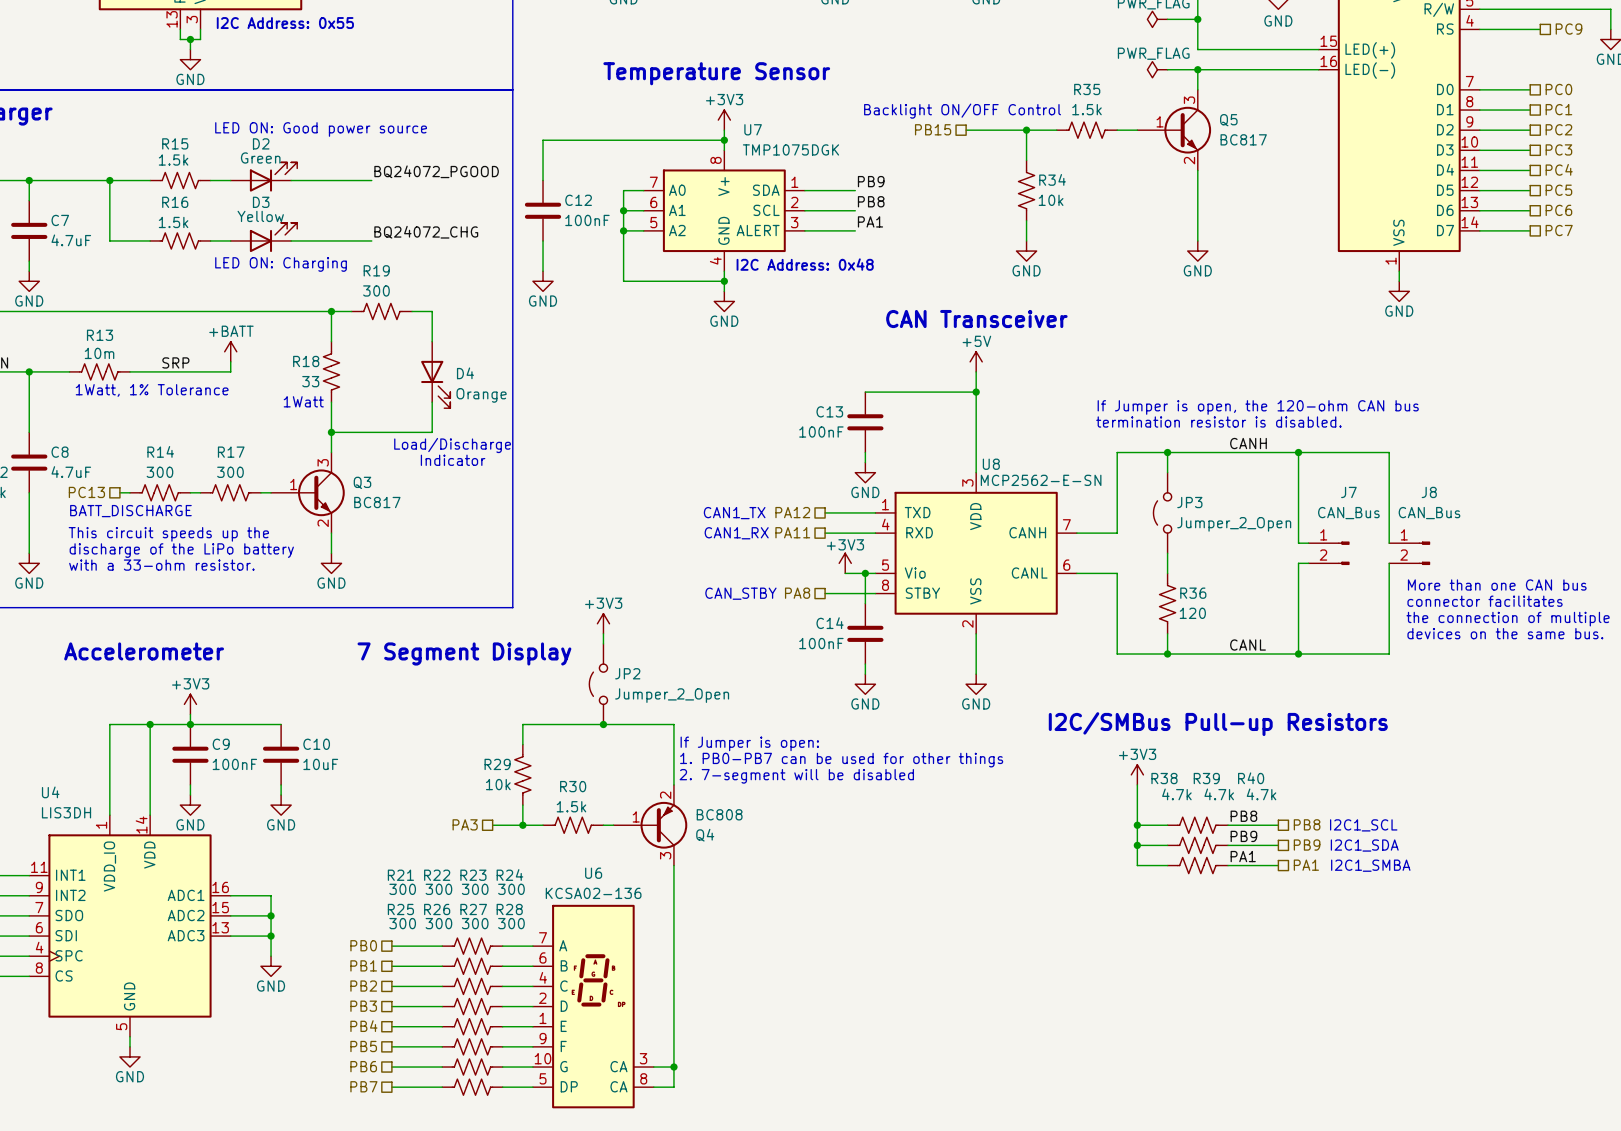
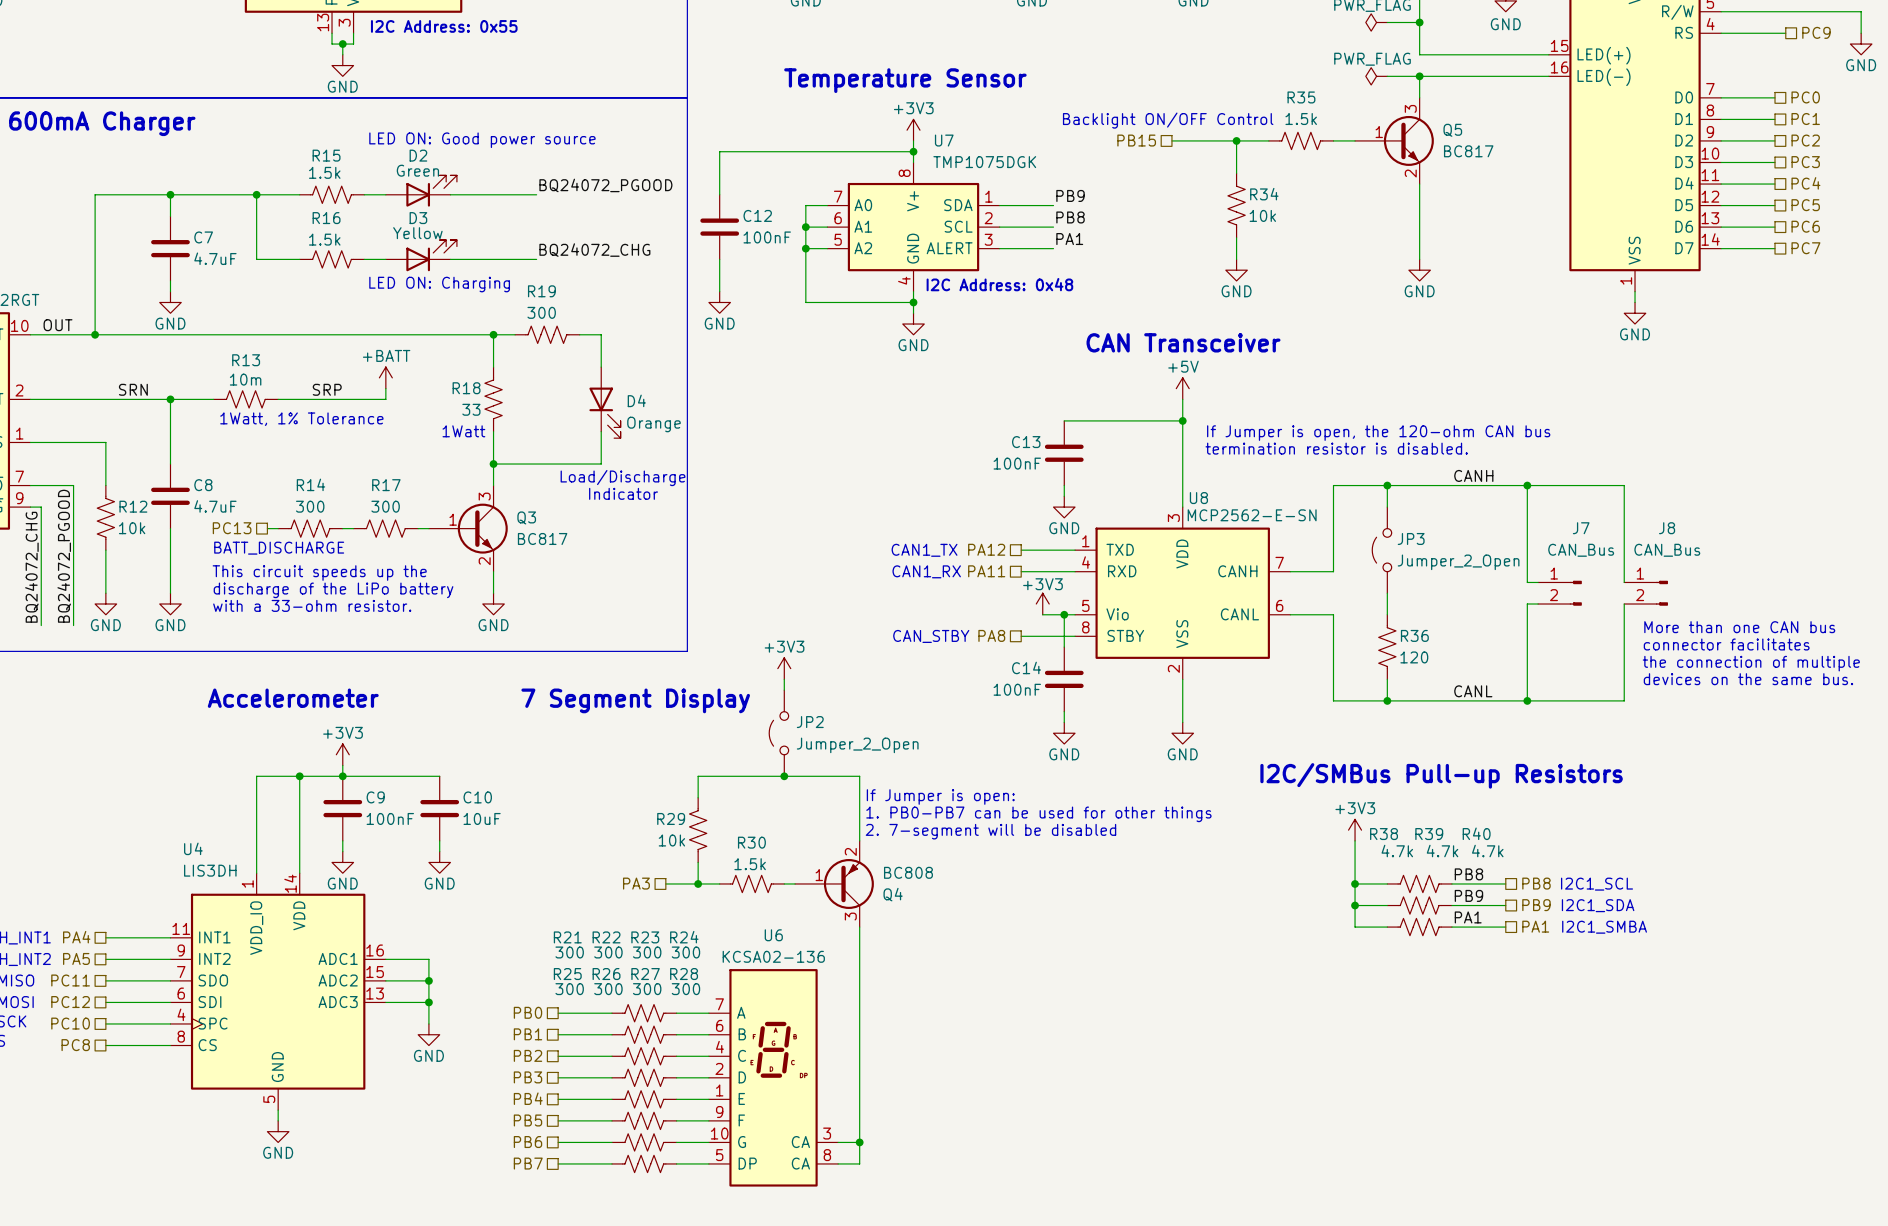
text position: If Jumper is open, the 120-ohm CAN bus (1258, 407) -> If Jumper is open, the 120-ohm CAN bus (1378, 433)
text position: termination resistor is disabled. (1218, 422) -> termination resistor is disabled. (1336, 448)

